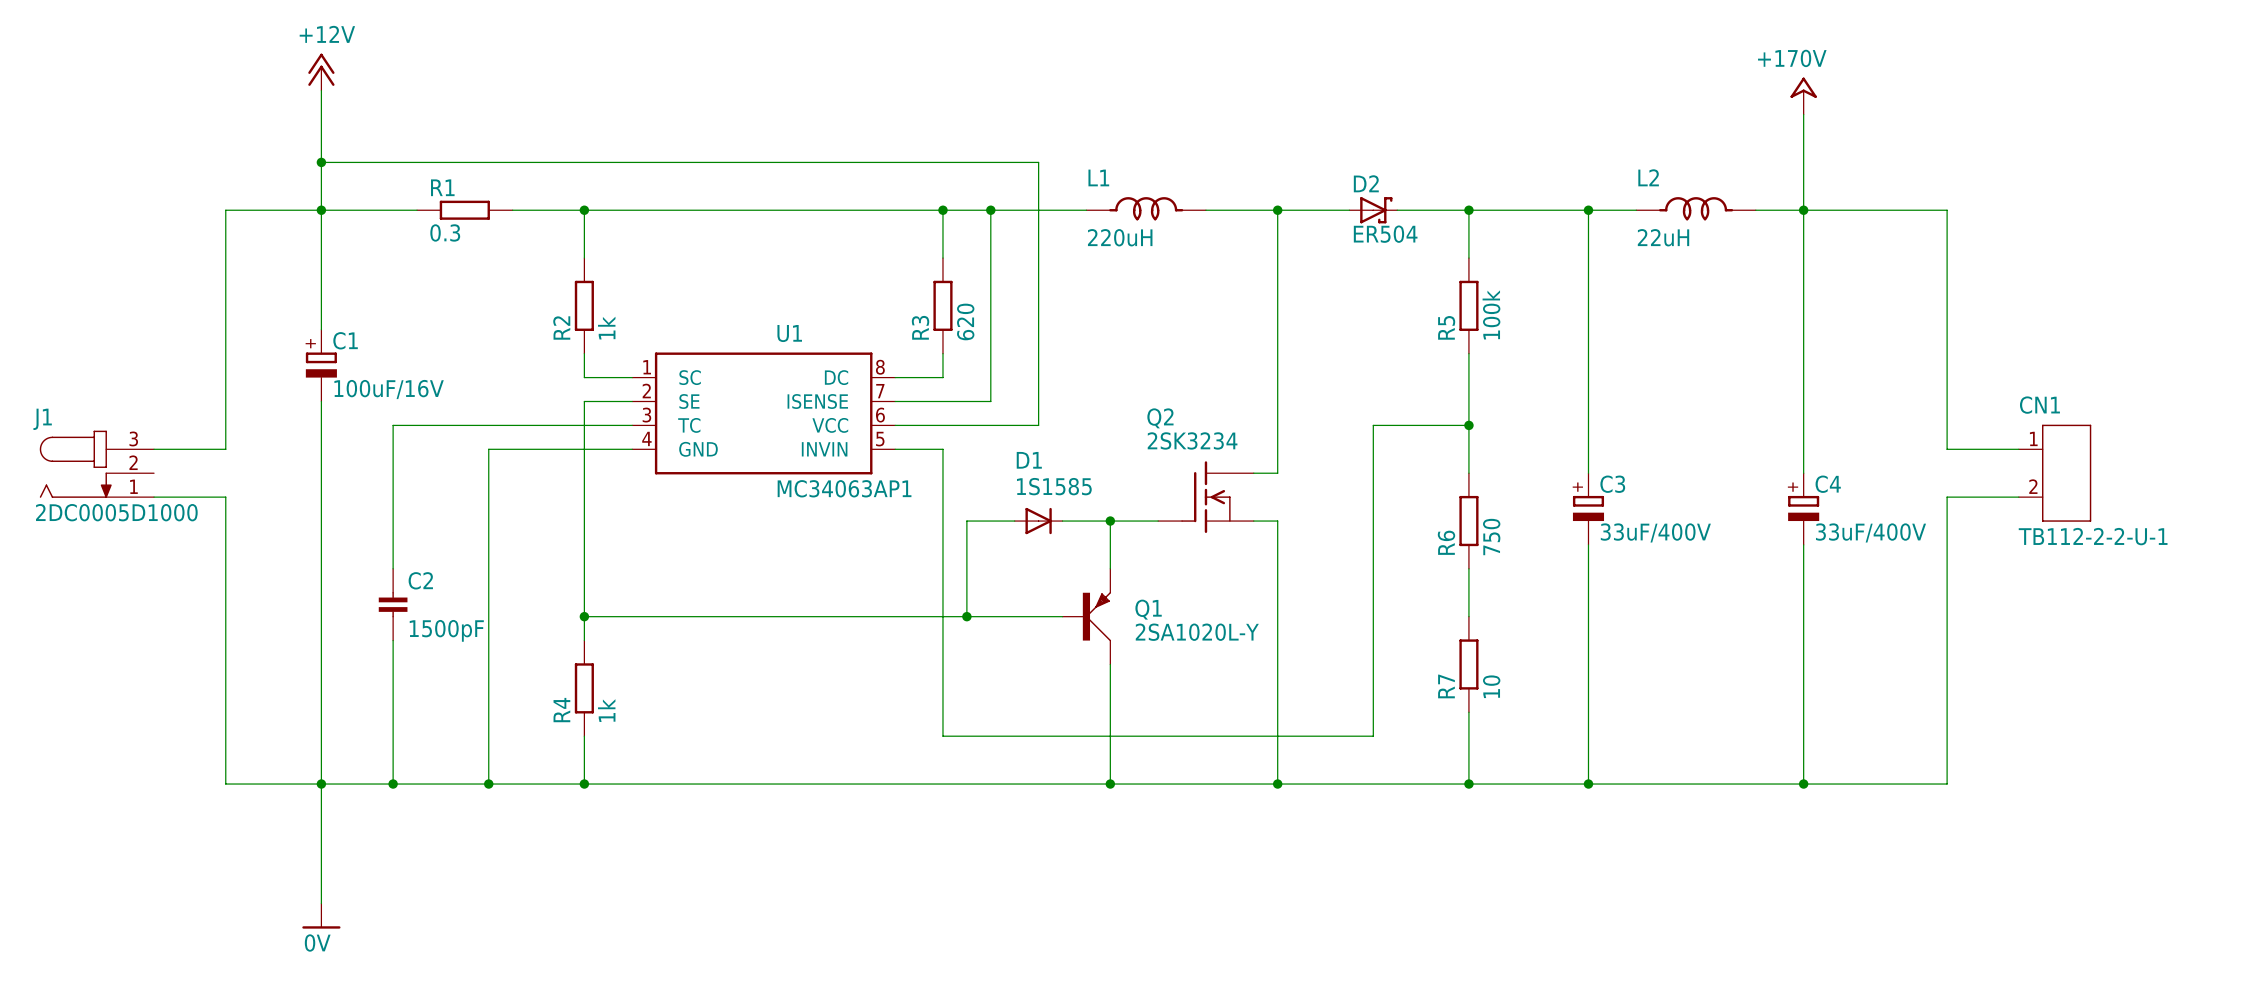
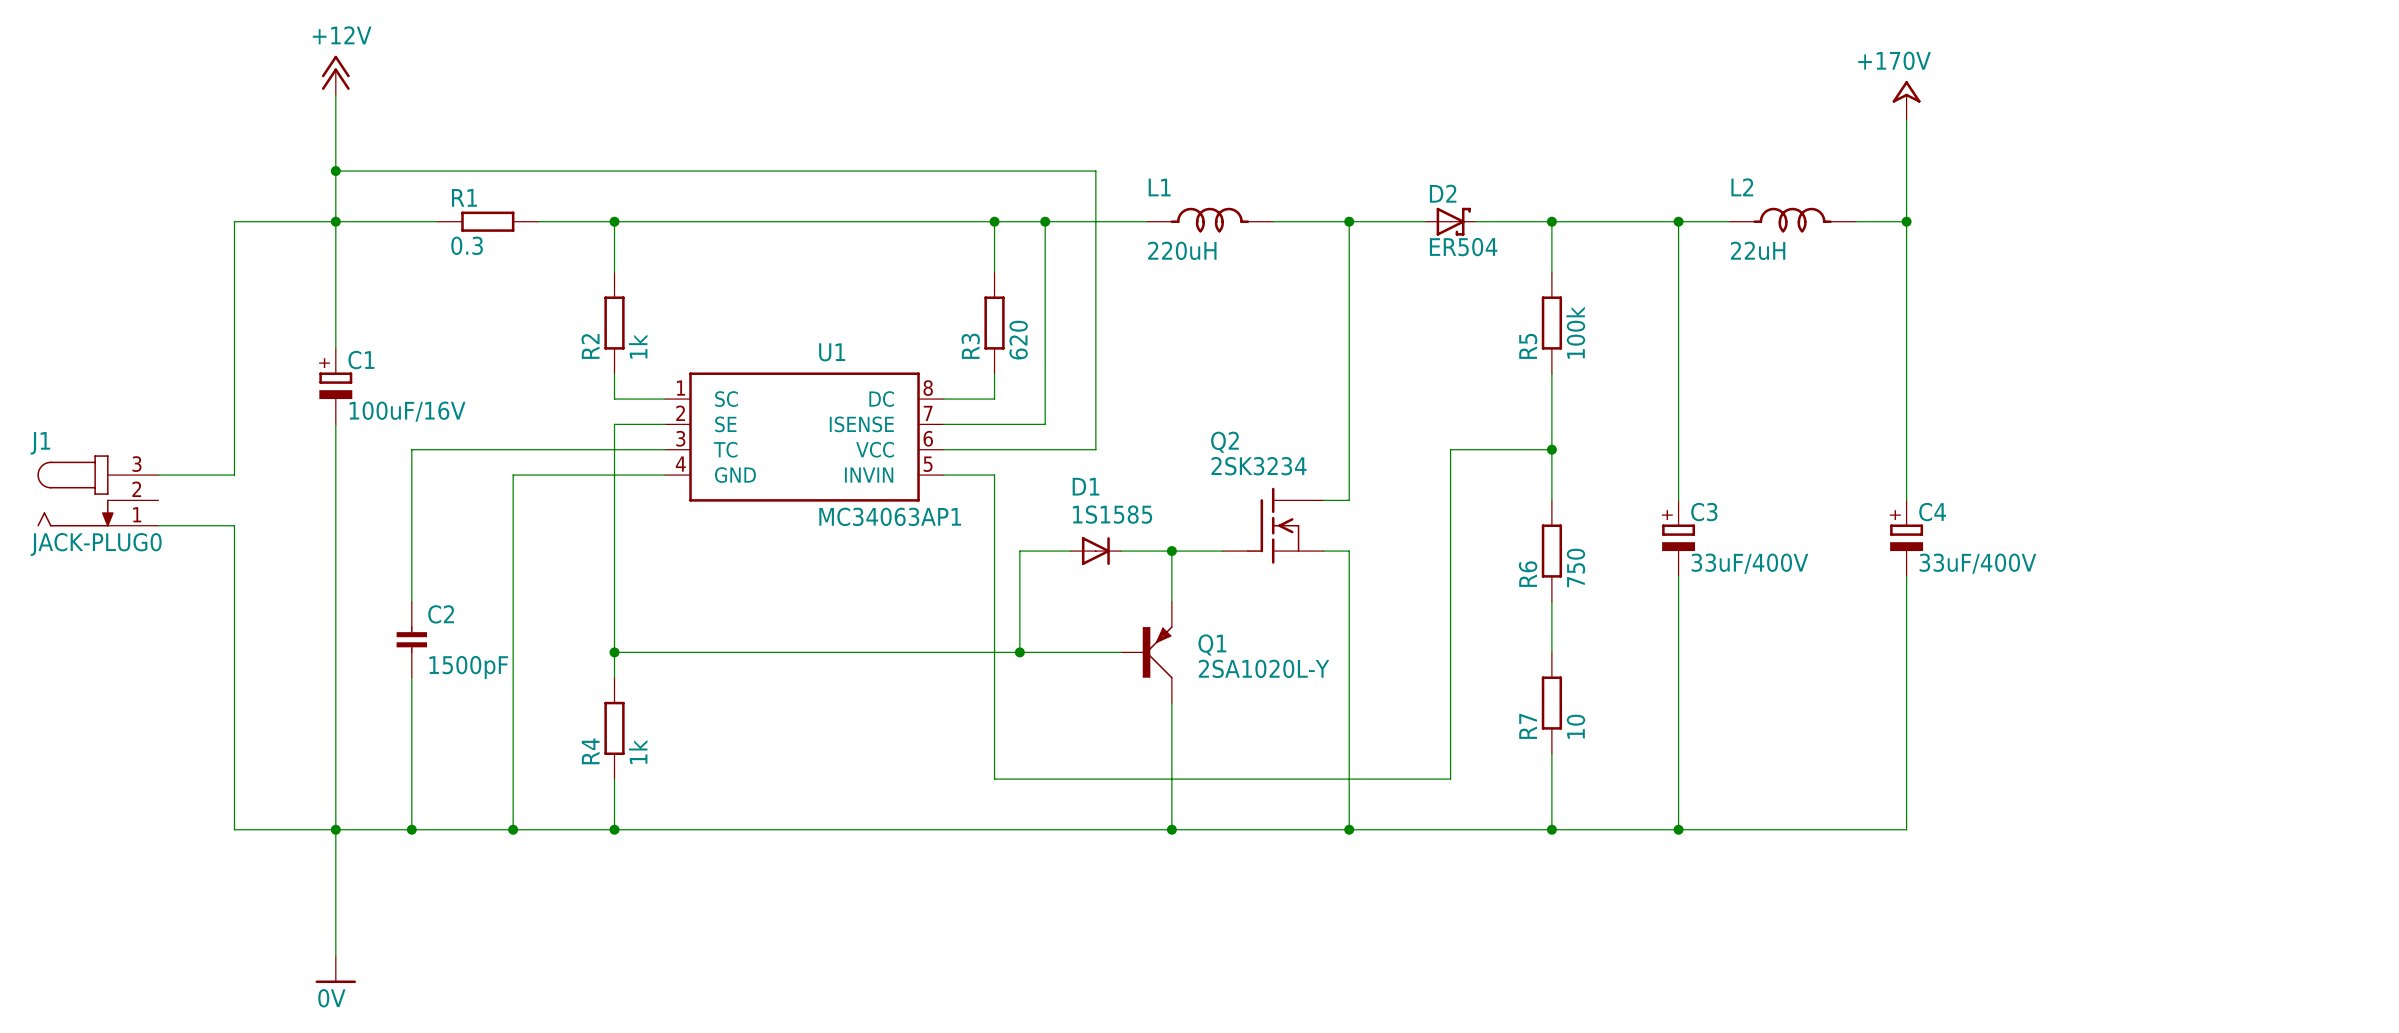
wire: (1803, 210) (1947, 210) (1947, 449) (2018, 449) -> none
CN1: TB112-2-2-U-1 (2055, 473) -> none
wire: (2018, 497) (1947, 497) (1947, 784) (1803, 784) -> none
J1 value: 2DC0005D1000 (116, 512) -> JACK-PLUG0 (96, 544)
junction: (1803, 784) -> none

